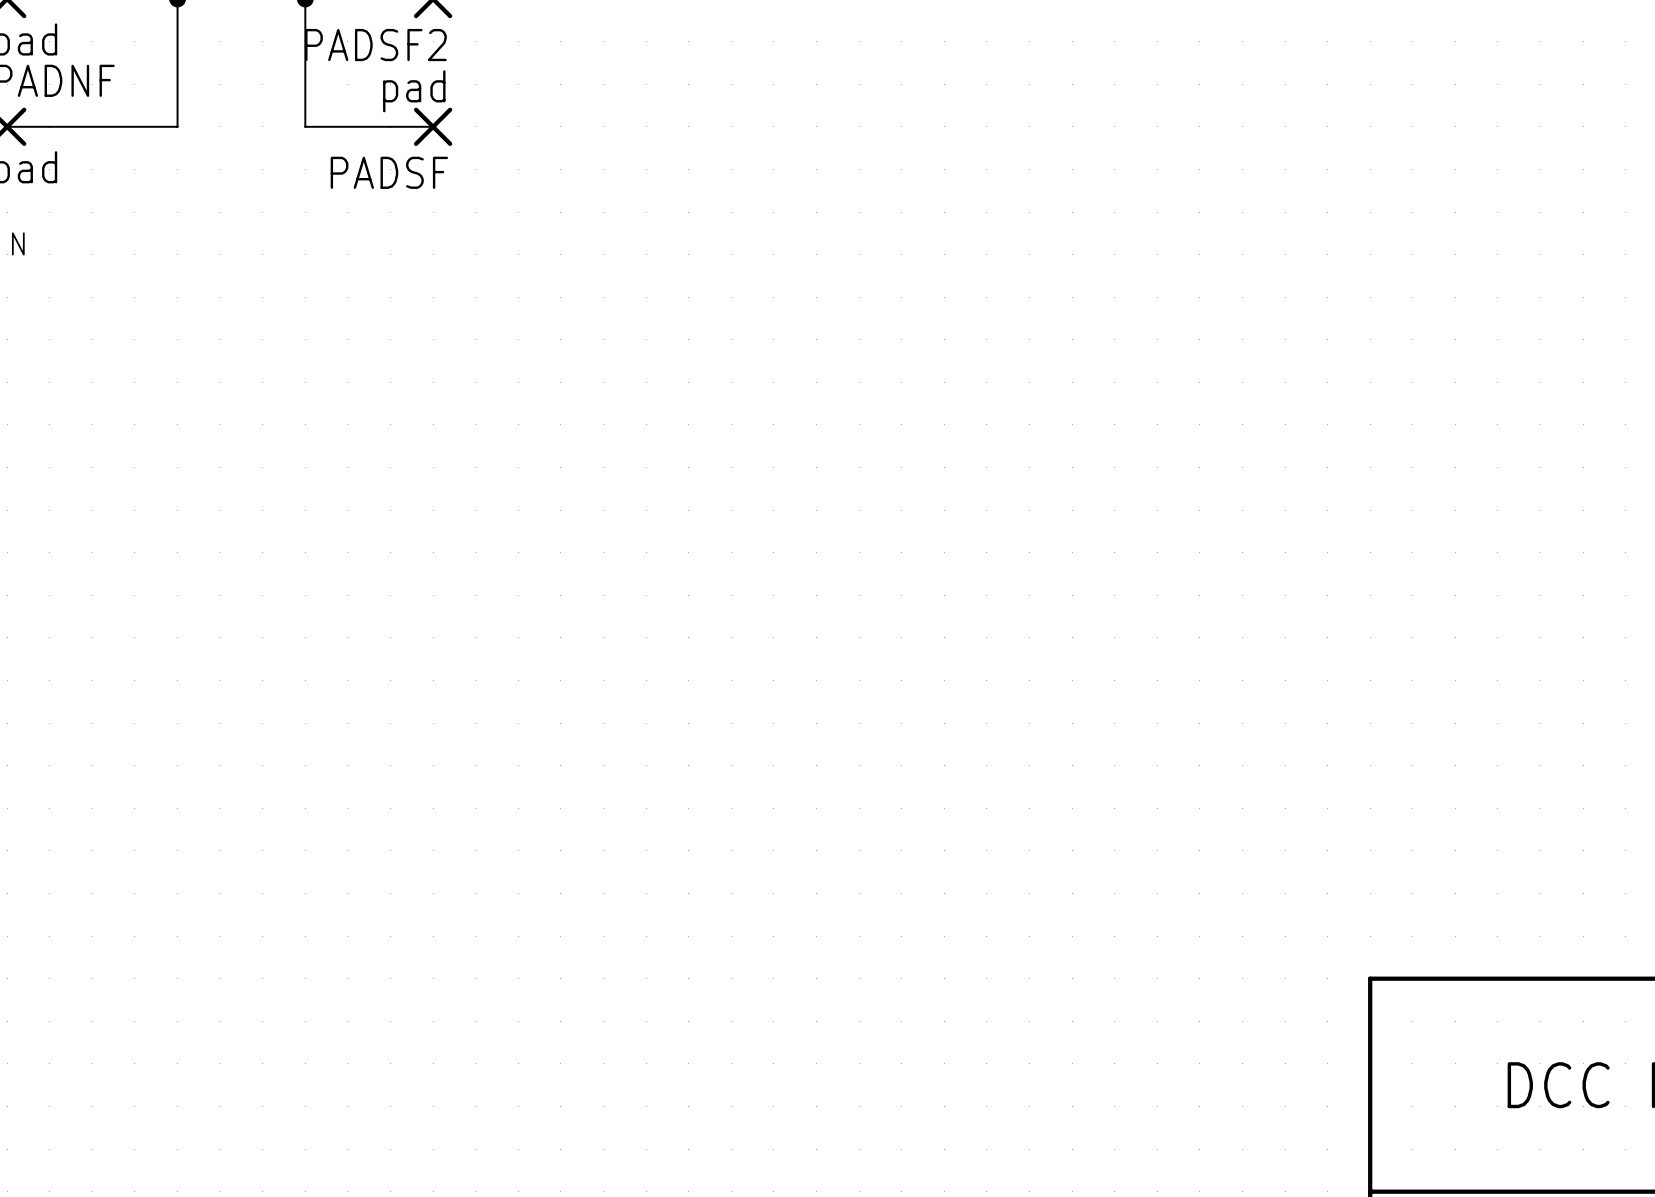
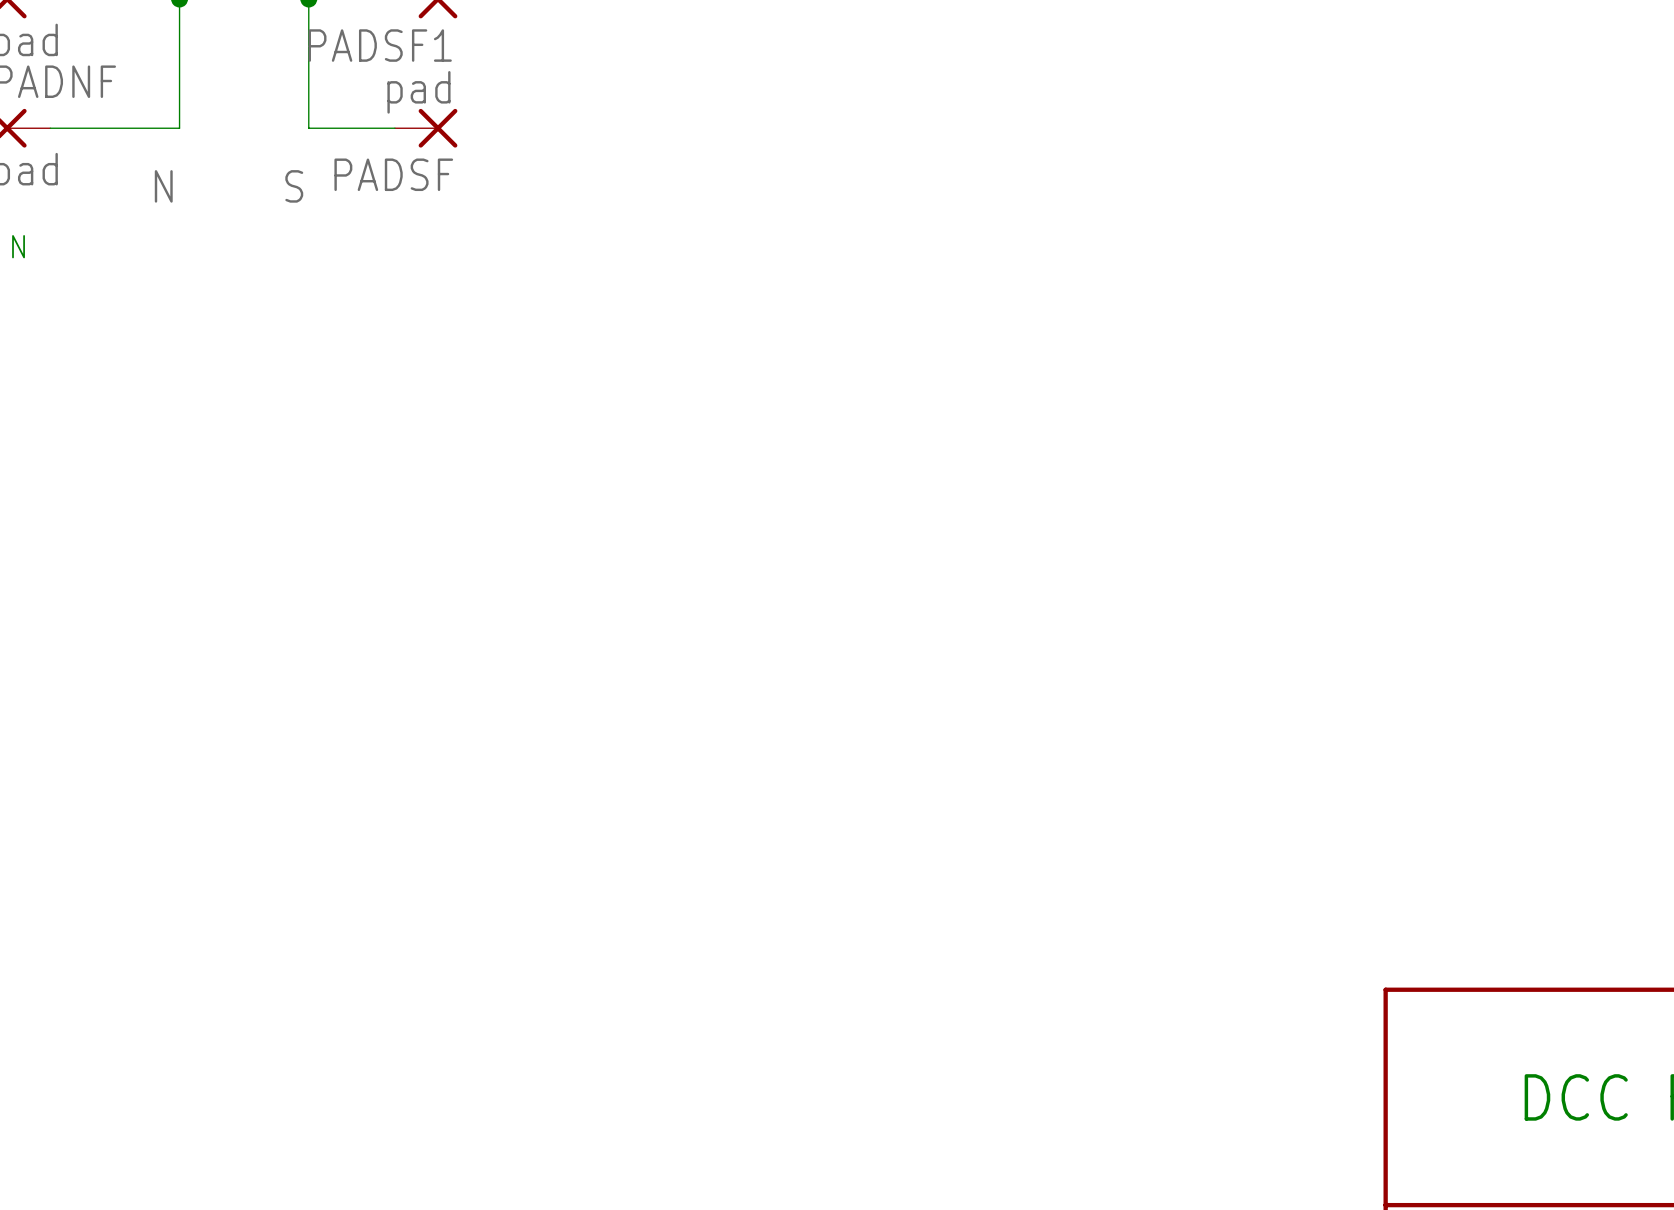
PADSF2 name: PADSF2 (375, 45) -> PADSF1 (380, 45)
label: none -> N (163, 186)
label: none -> S (294, 186)

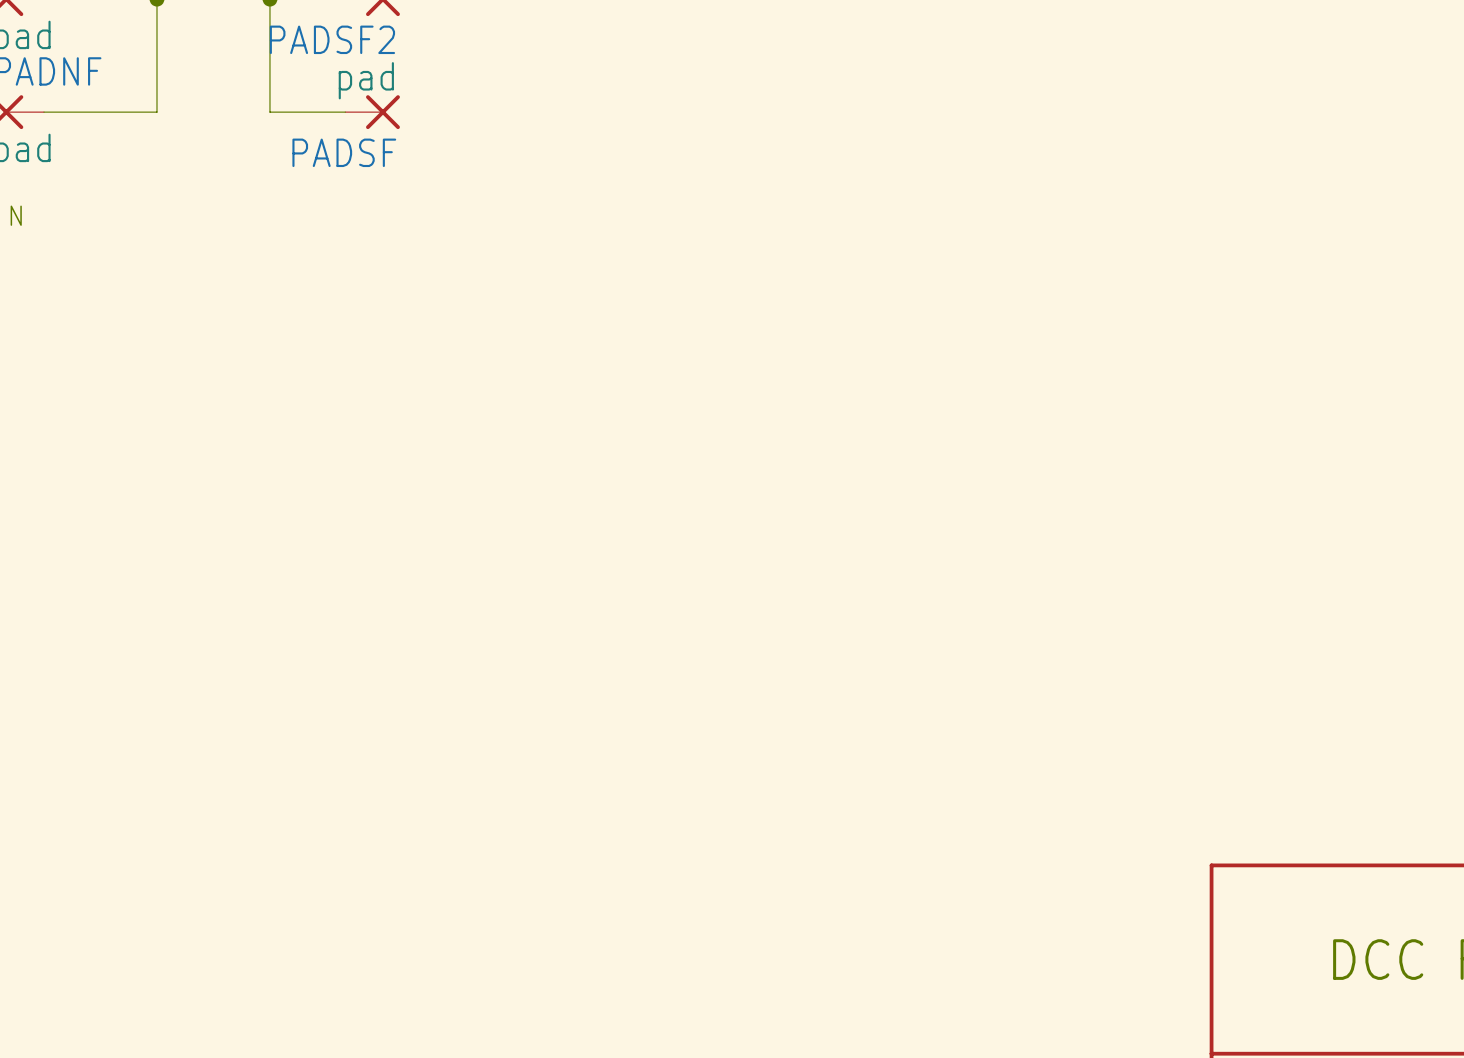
PADSF1 name: PADSF1 (380, 45) -> PADSF2 (332, 39)
label: N (163, 186) -> none
label: S (294, 186) -> none

